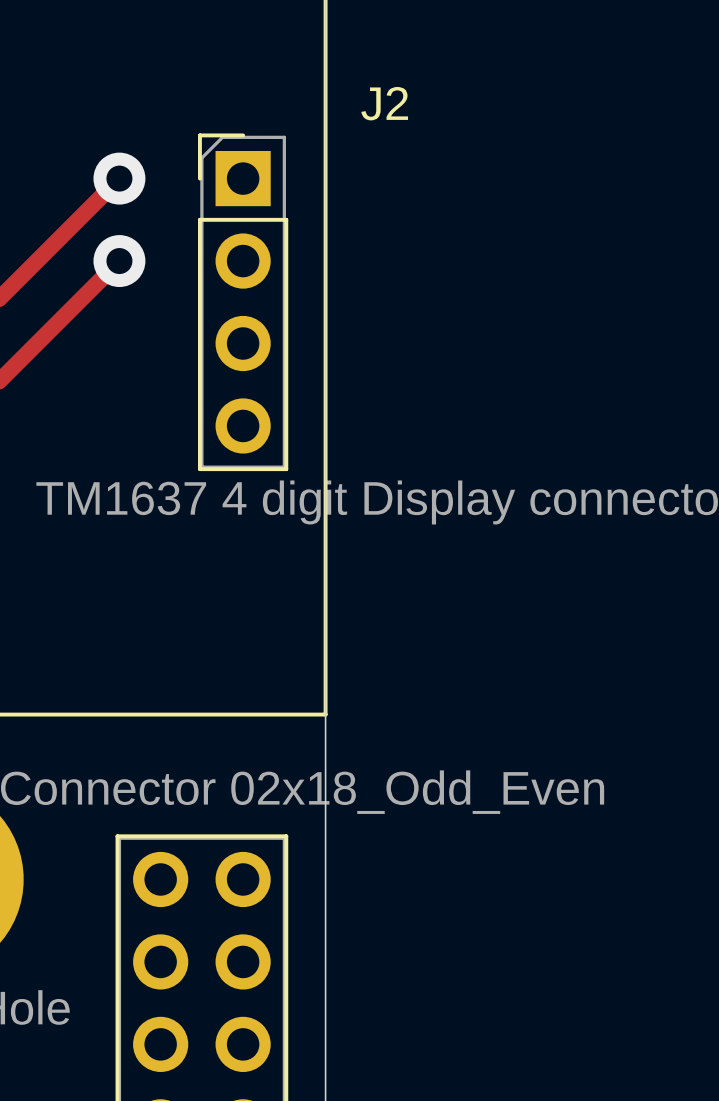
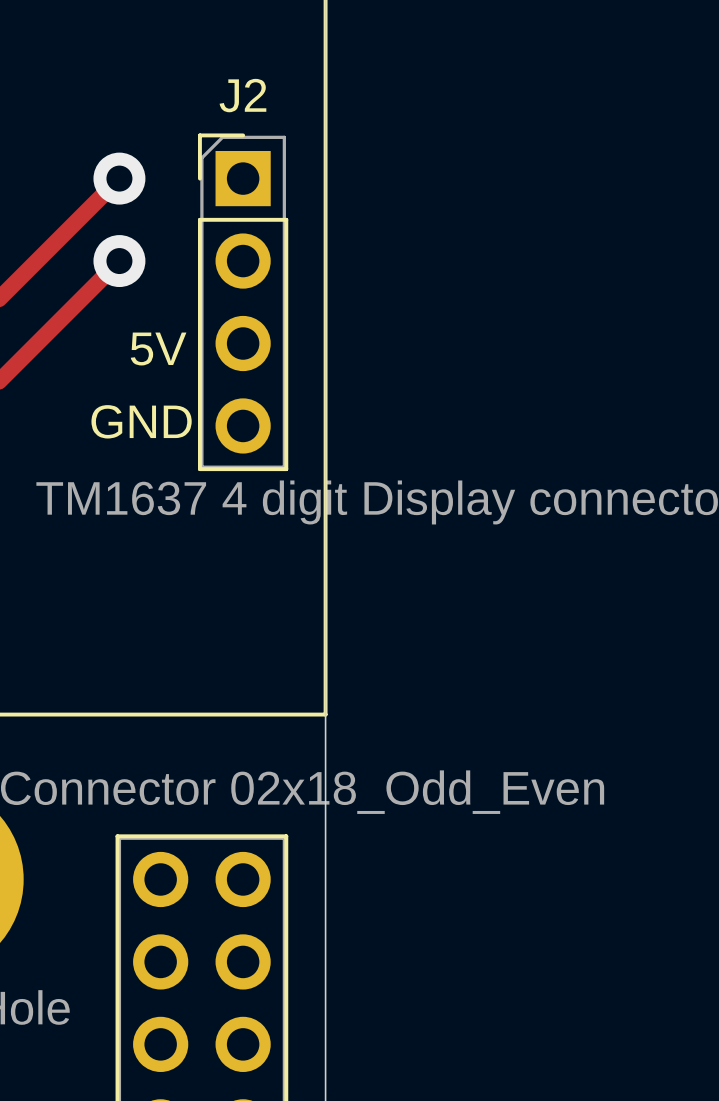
J2 name position: J2 (384, 103) -> J2 (242, 95)
text: none -> 5V (158, 349)
text: none -> GND (141, 421)

